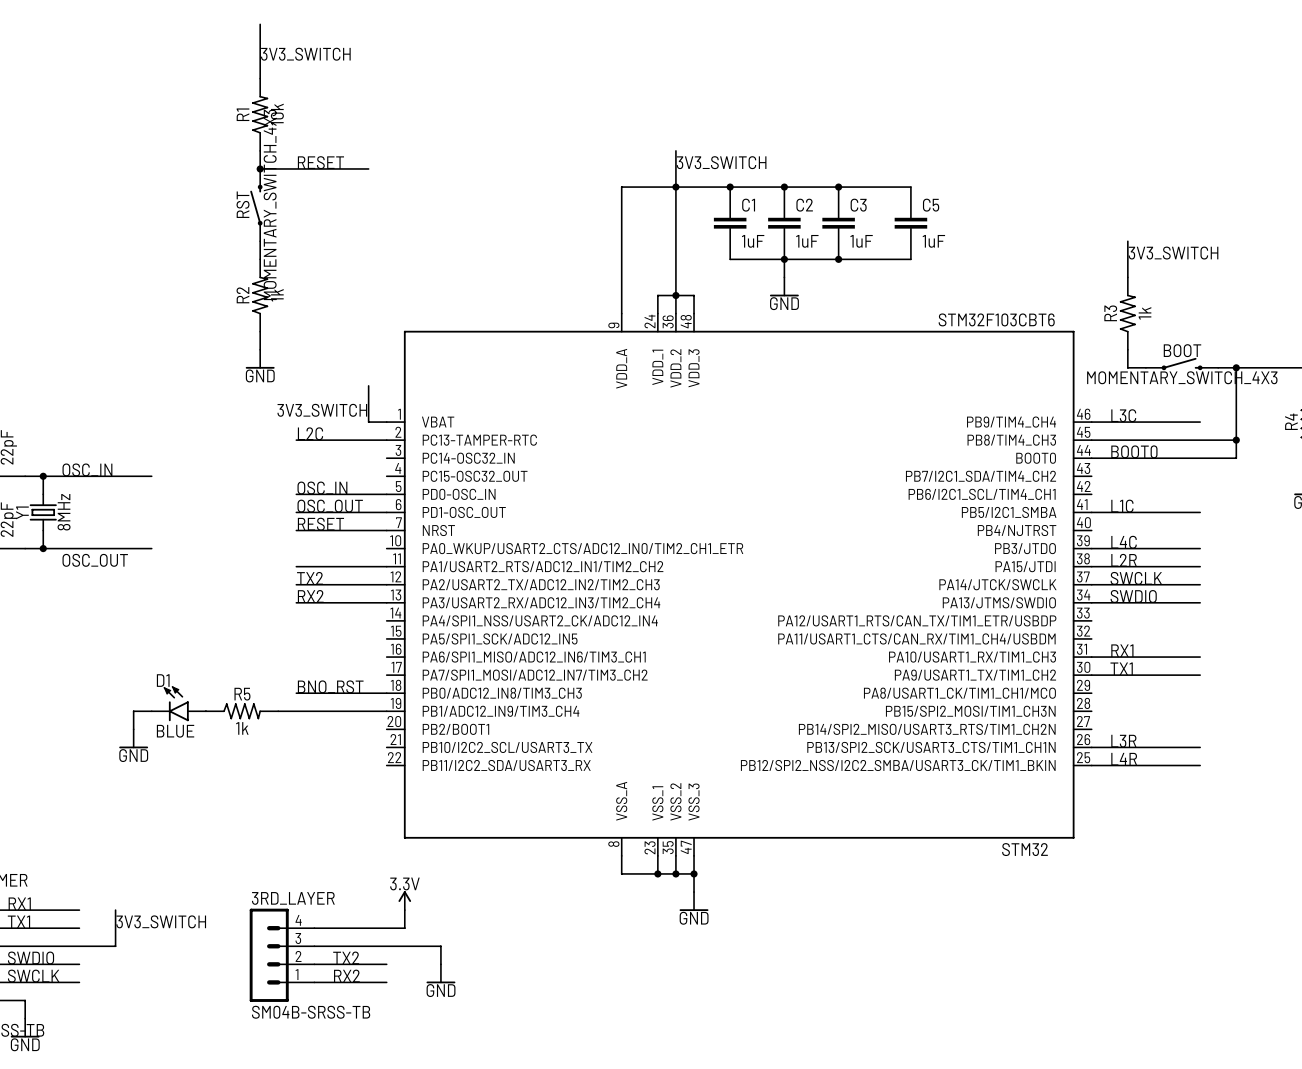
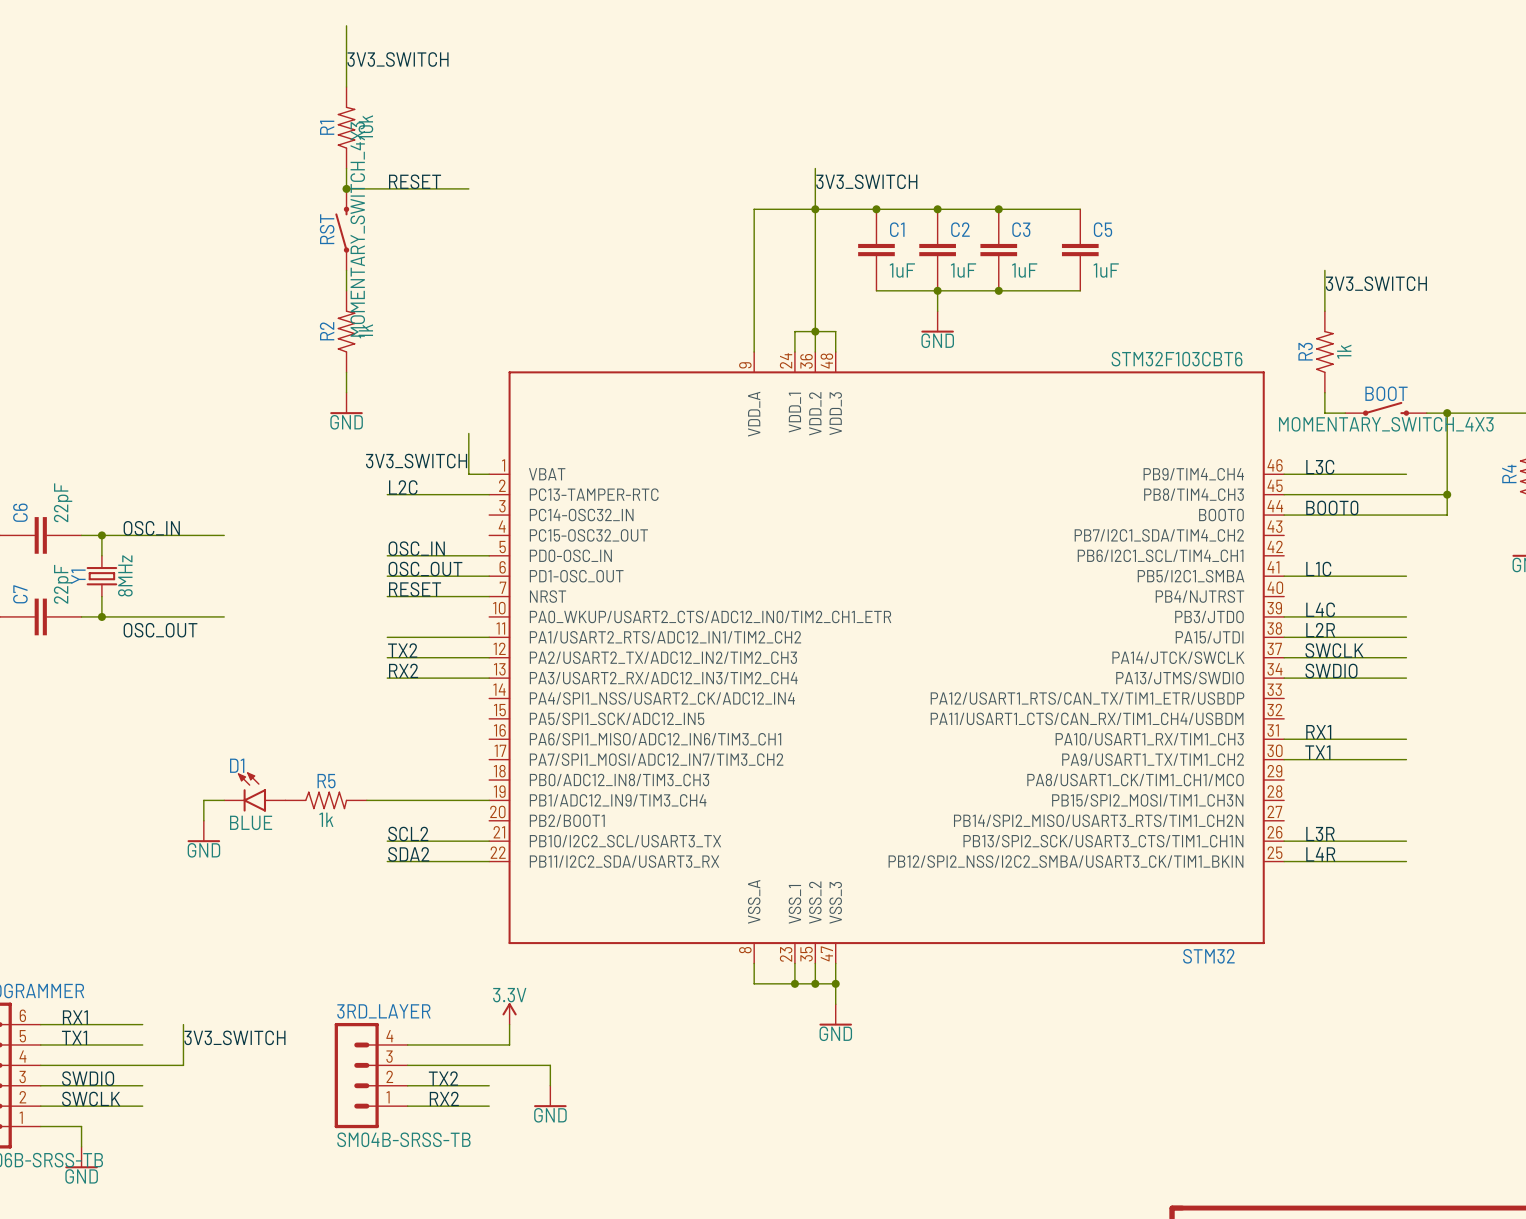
label: BNO_RST (330, 686) -> none
wire: (296, 693) (386, 693) -> (387, 841) (489, 841)
label: none -> SCL2 (408, 834)
label: none -> SDA2 (408, 854)
wire: none -> (387, 861) (489, 861)

